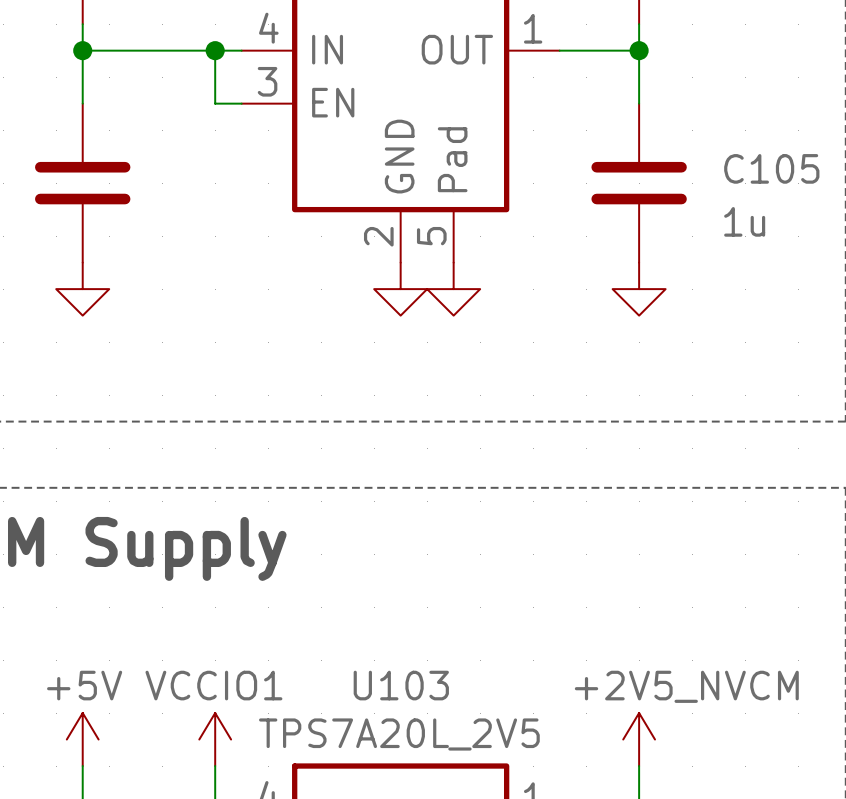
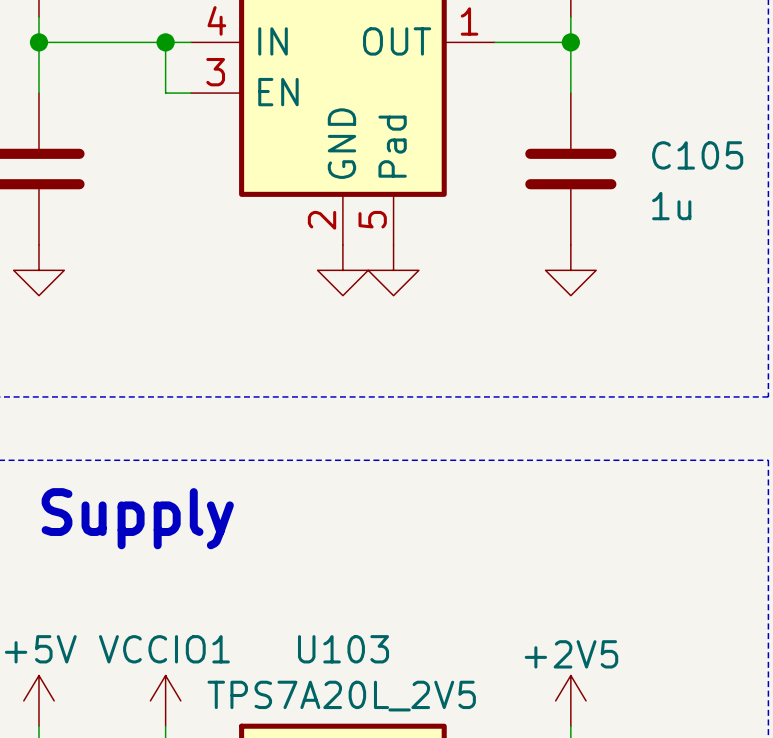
power symbol: +2V5_NVCM (639, 739) -> +2V5 (570, 700)

